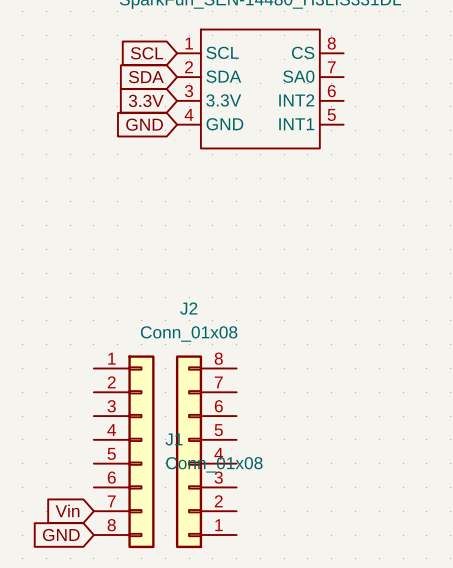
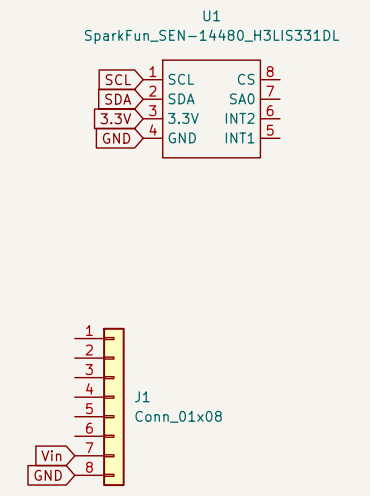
J2: Conn_01x08 (206, 451) -> none

